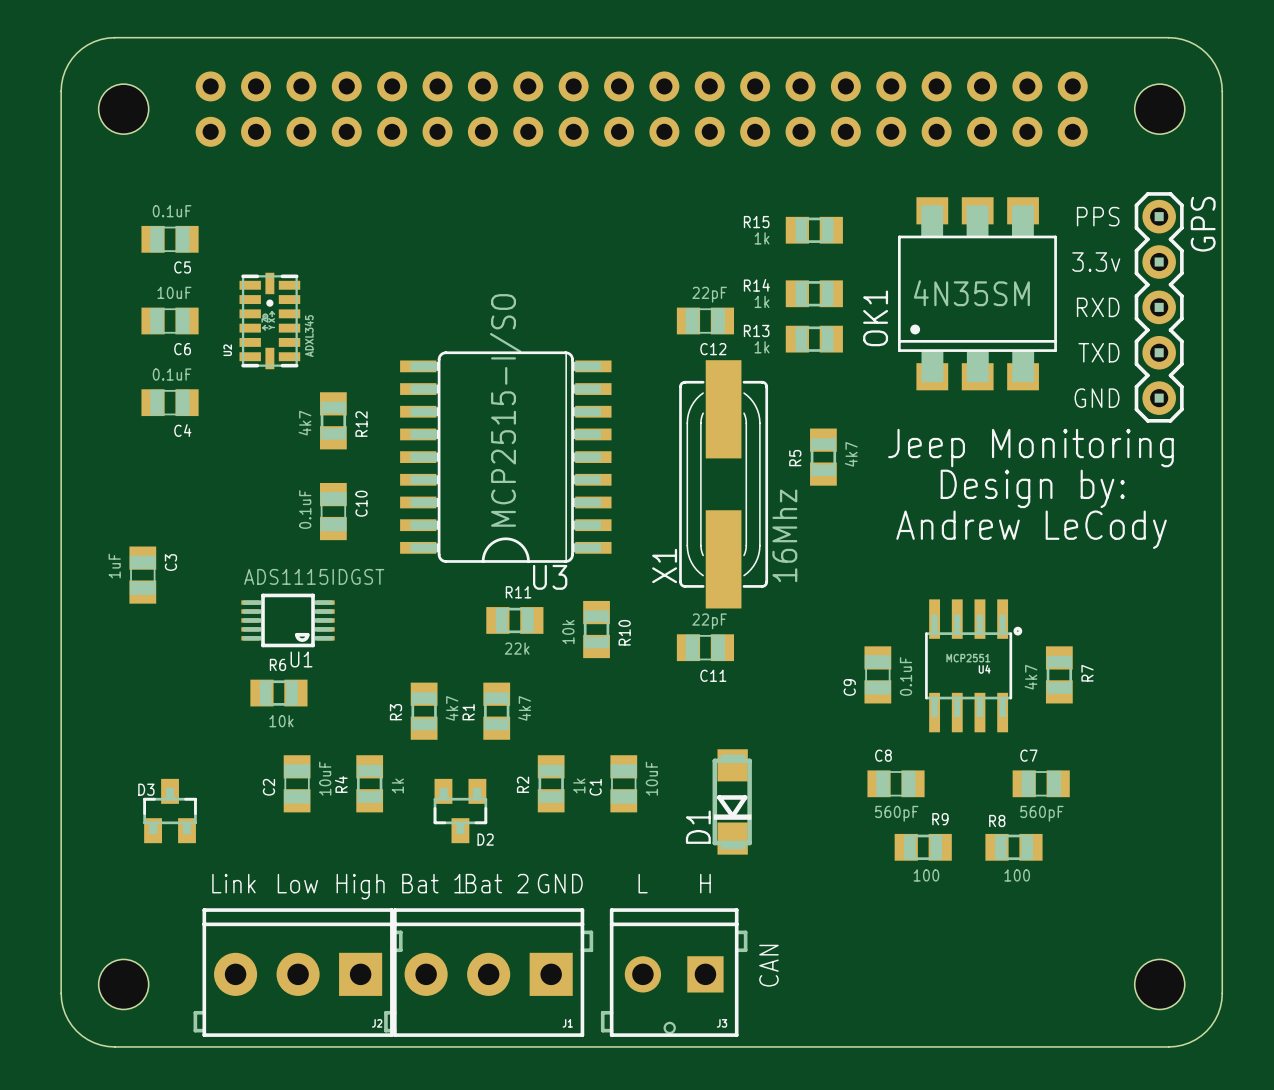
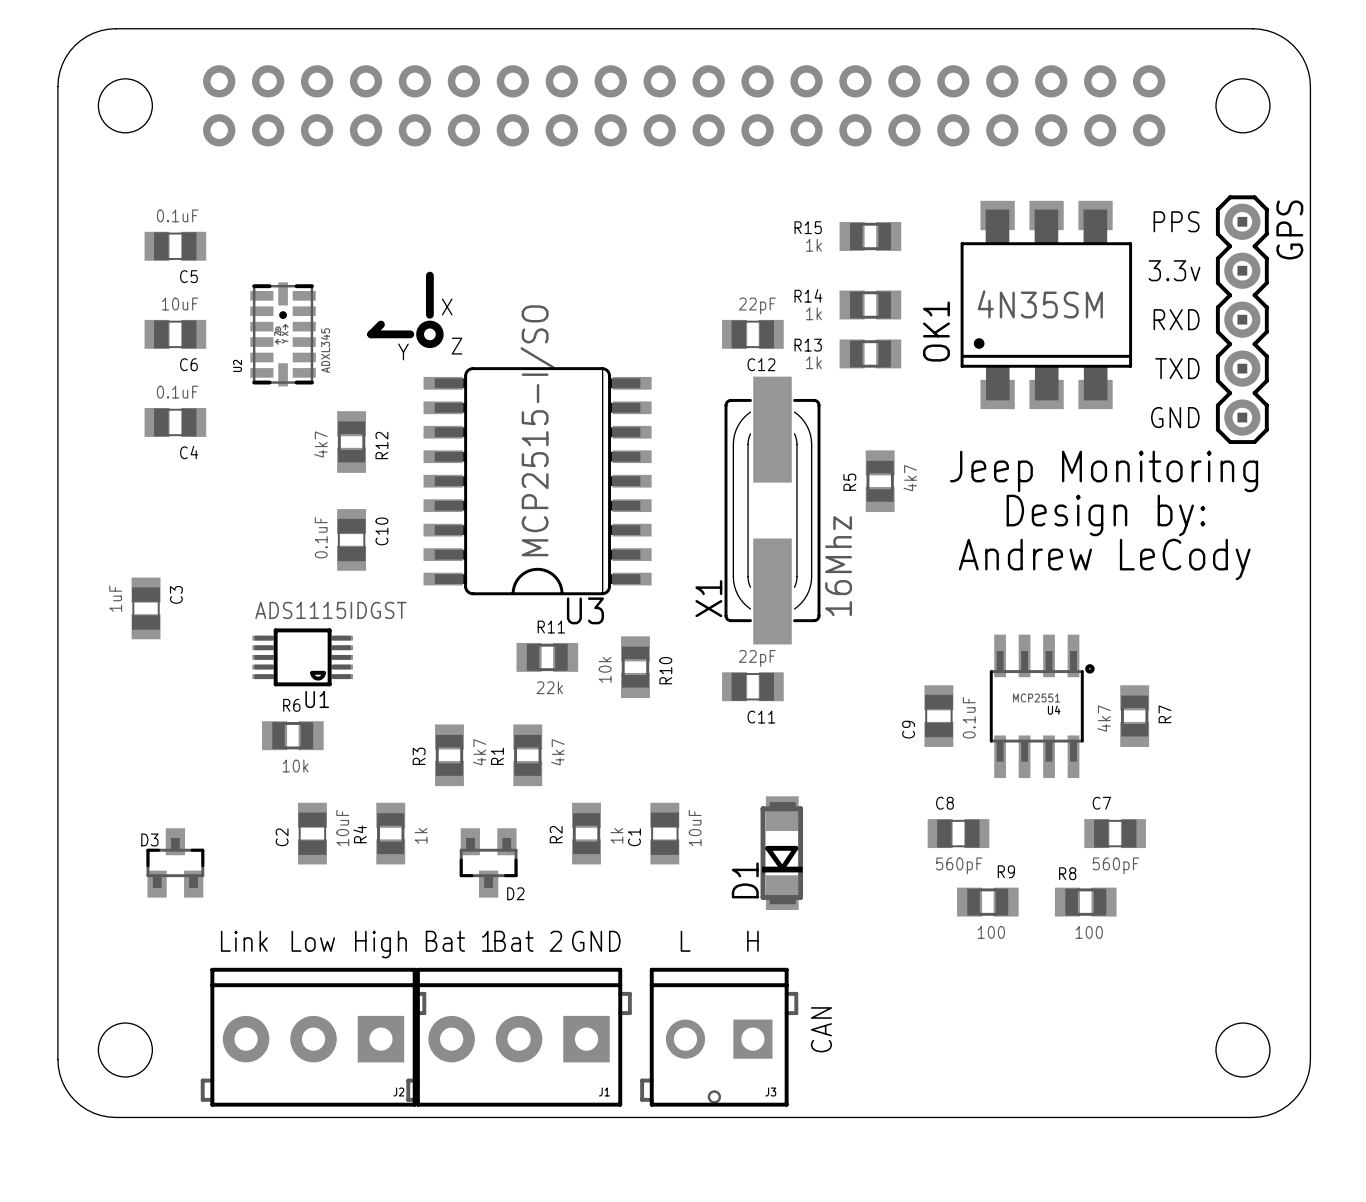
line: none -> (429, 275) (429, 314)
text: none -> X (447, 306)
drawing: none -> [416, 320, 444, 349]
line: none -> (380, 324) (371, 334) (410, 334)
text: none -> Z (457, 346)
text: none -> Y (403, 351)

